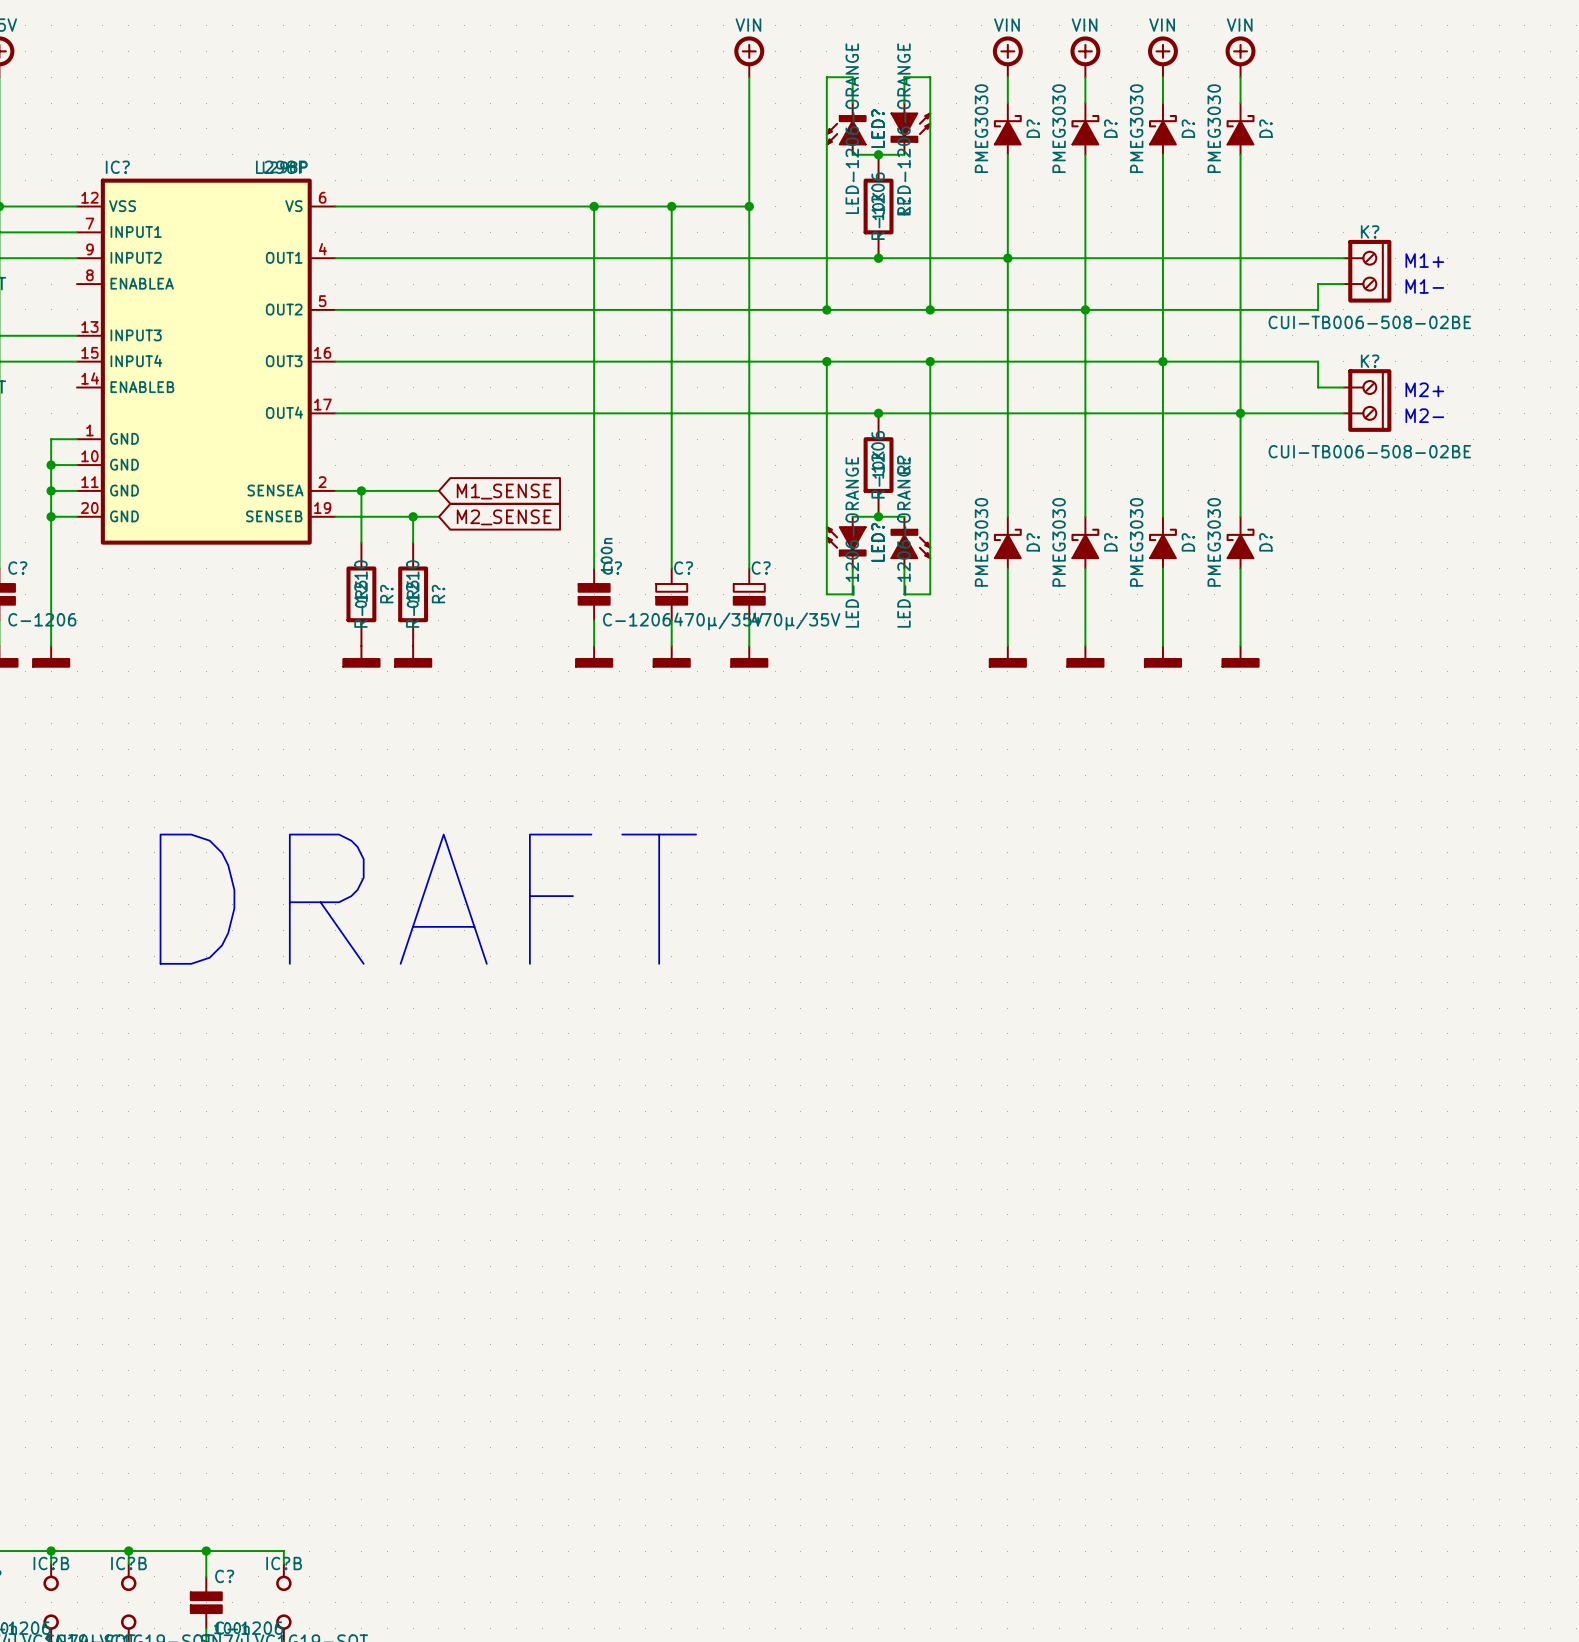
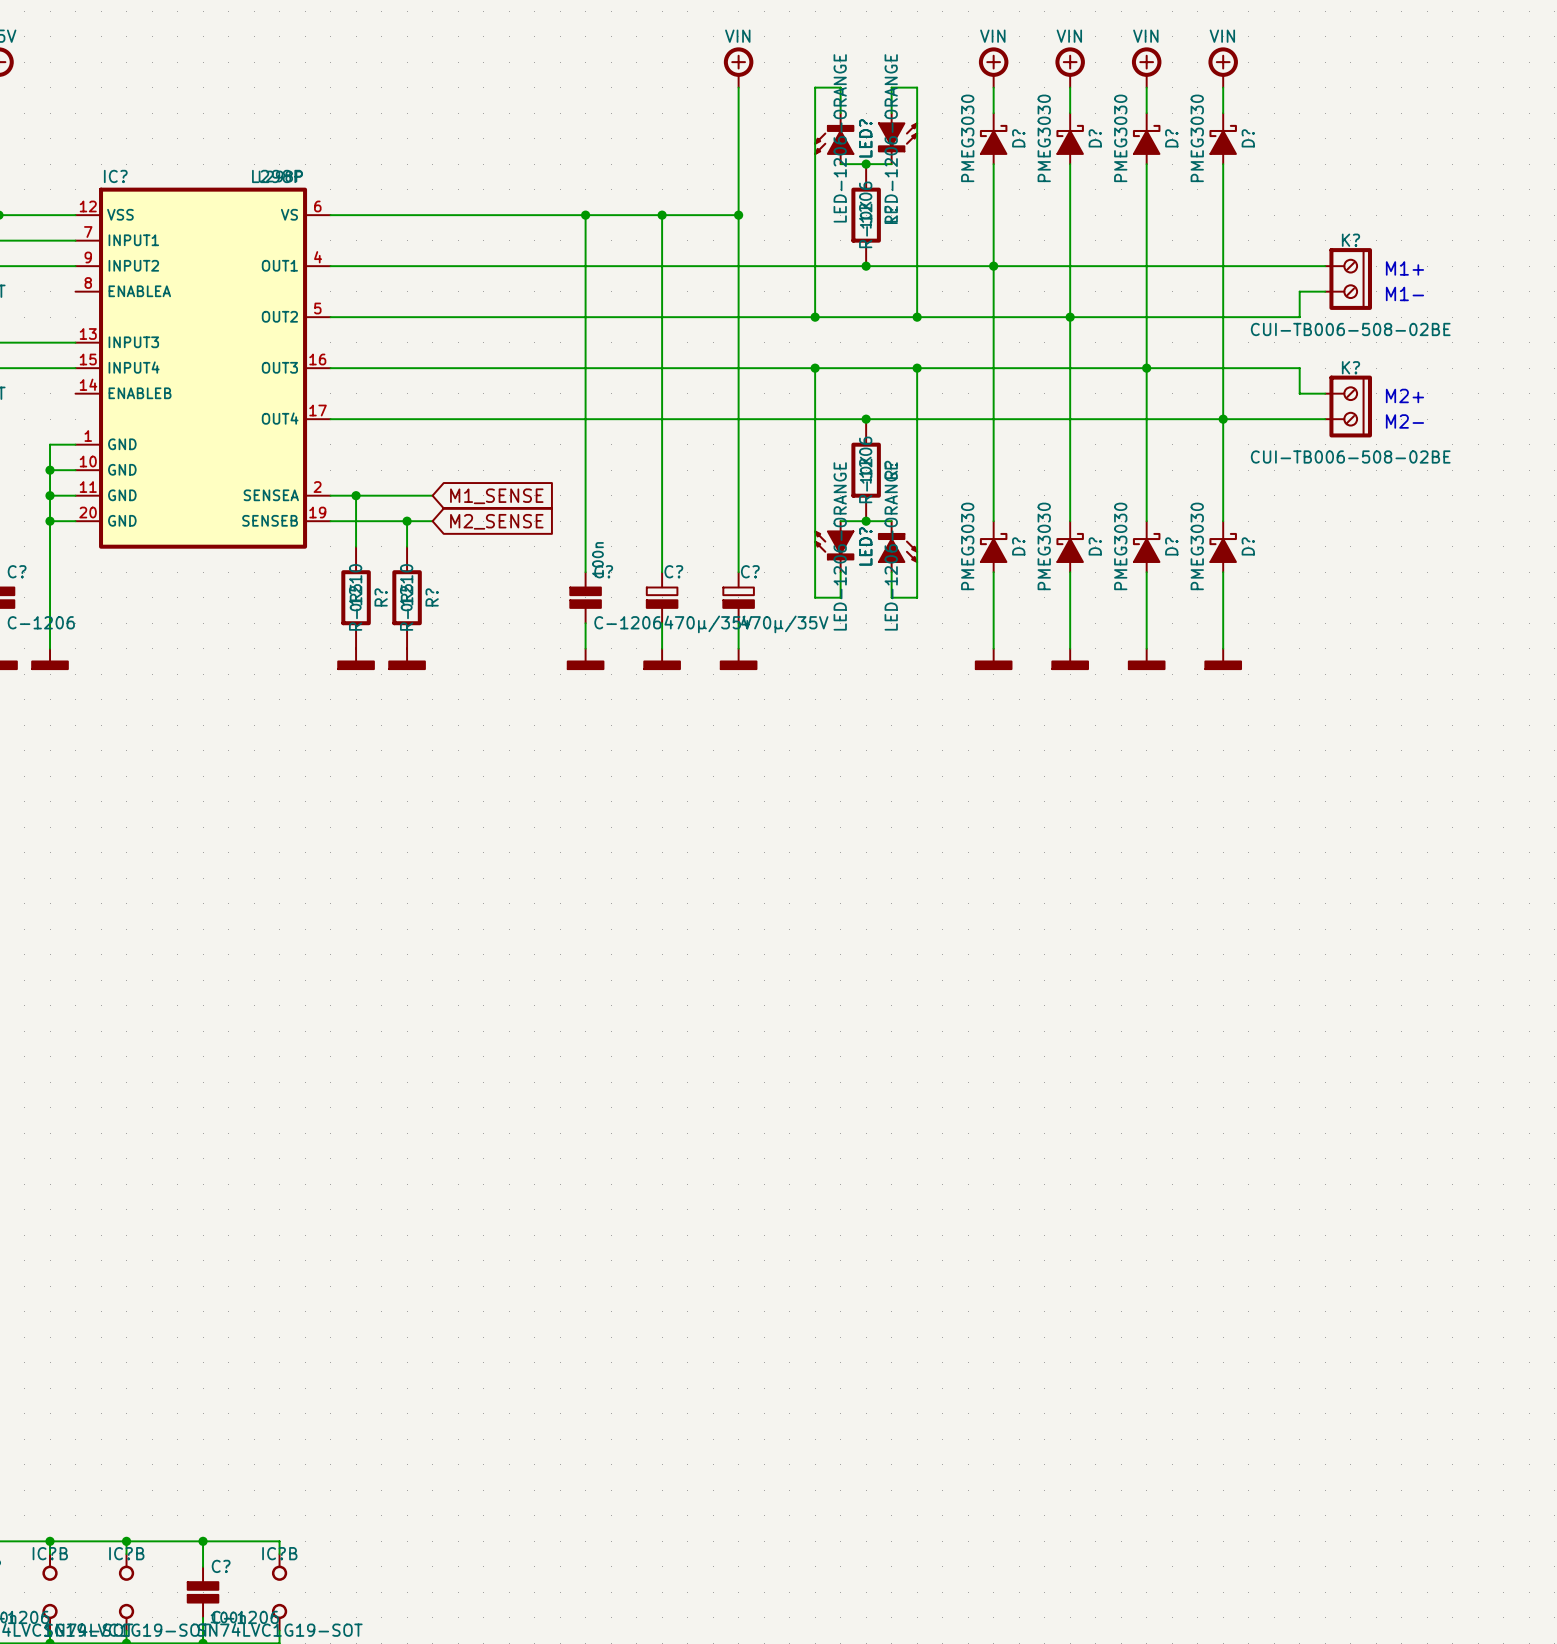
text: DRAFT (428, 899) -> none

